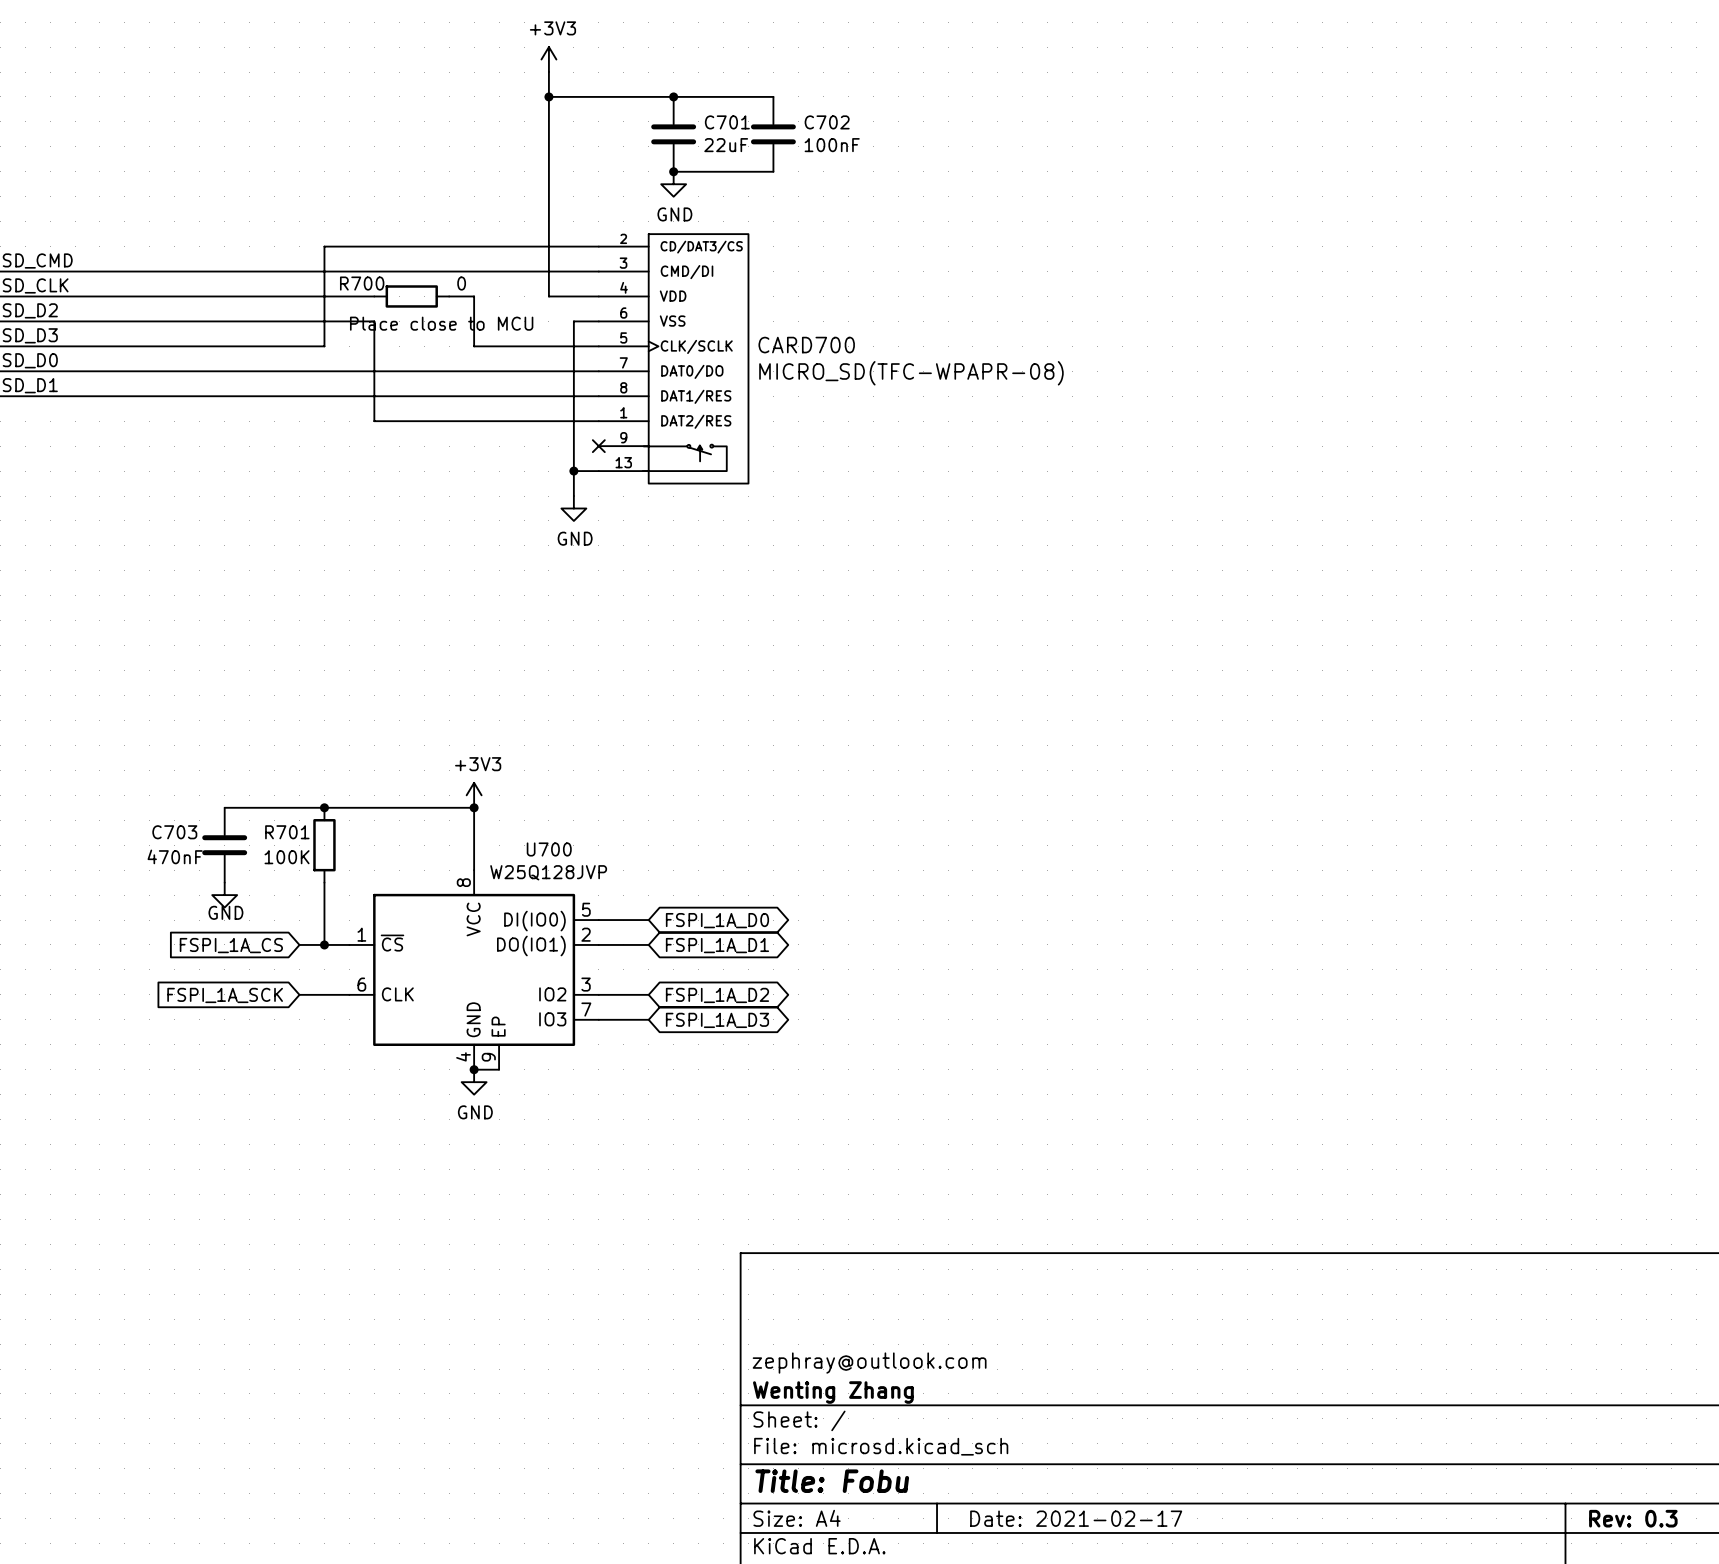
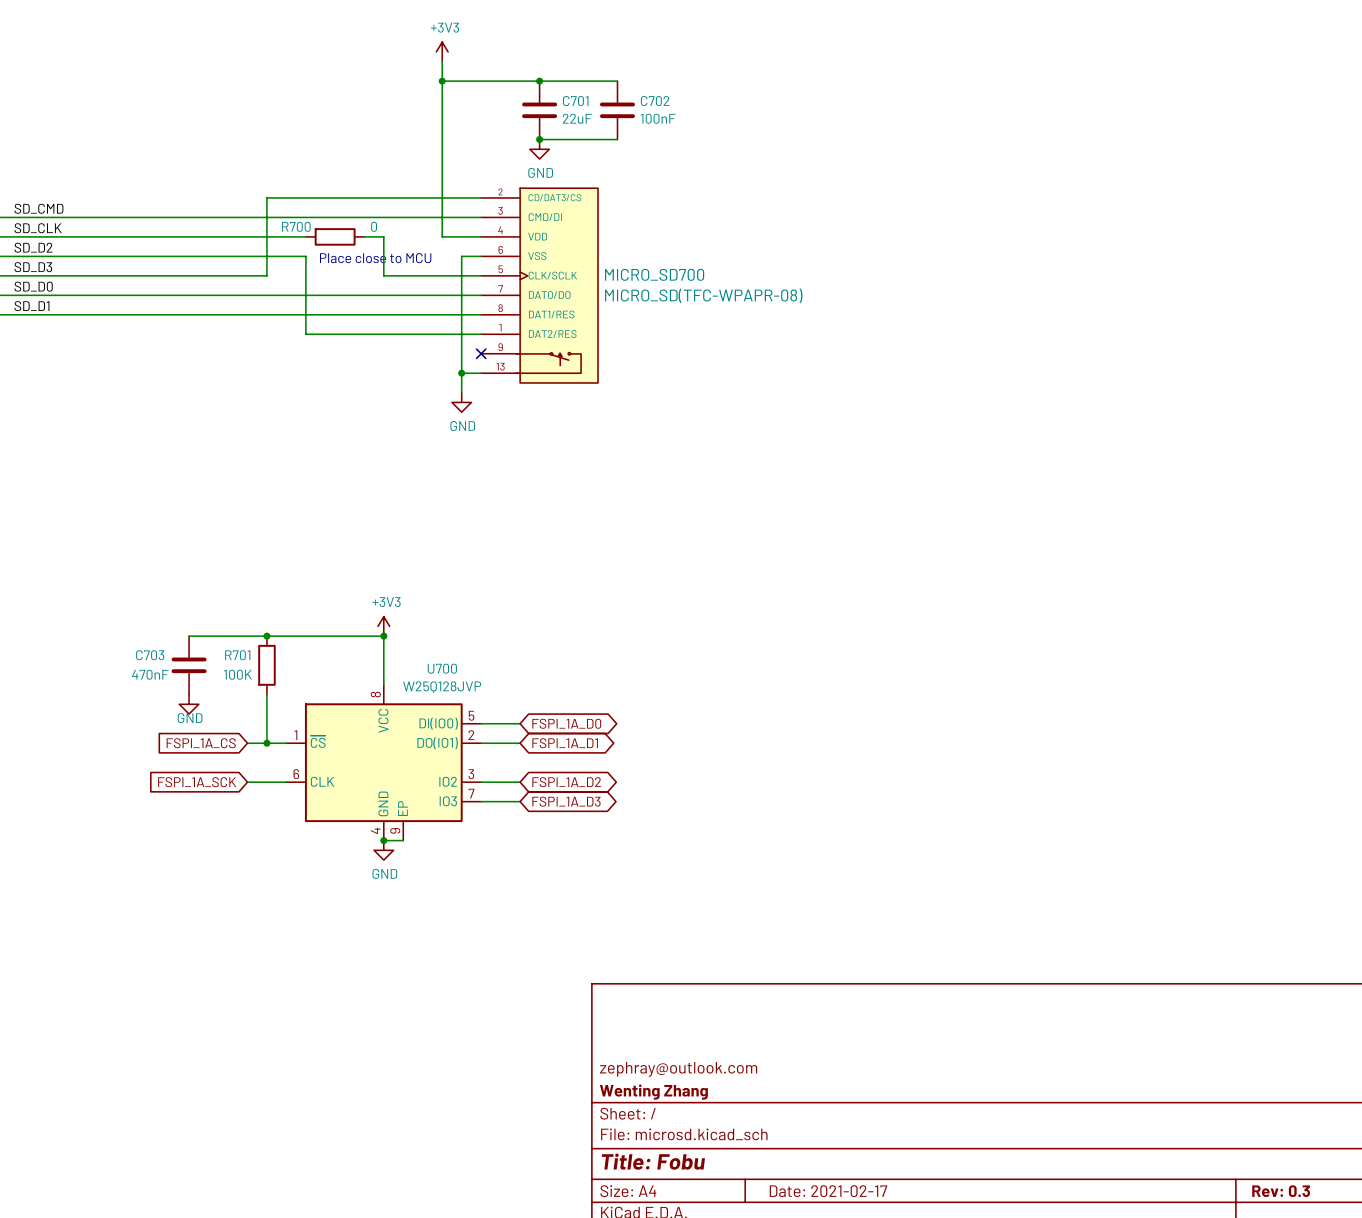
CARD700 name: CARD700 (806, 345) -> MICRO_SD700 (654, 274)

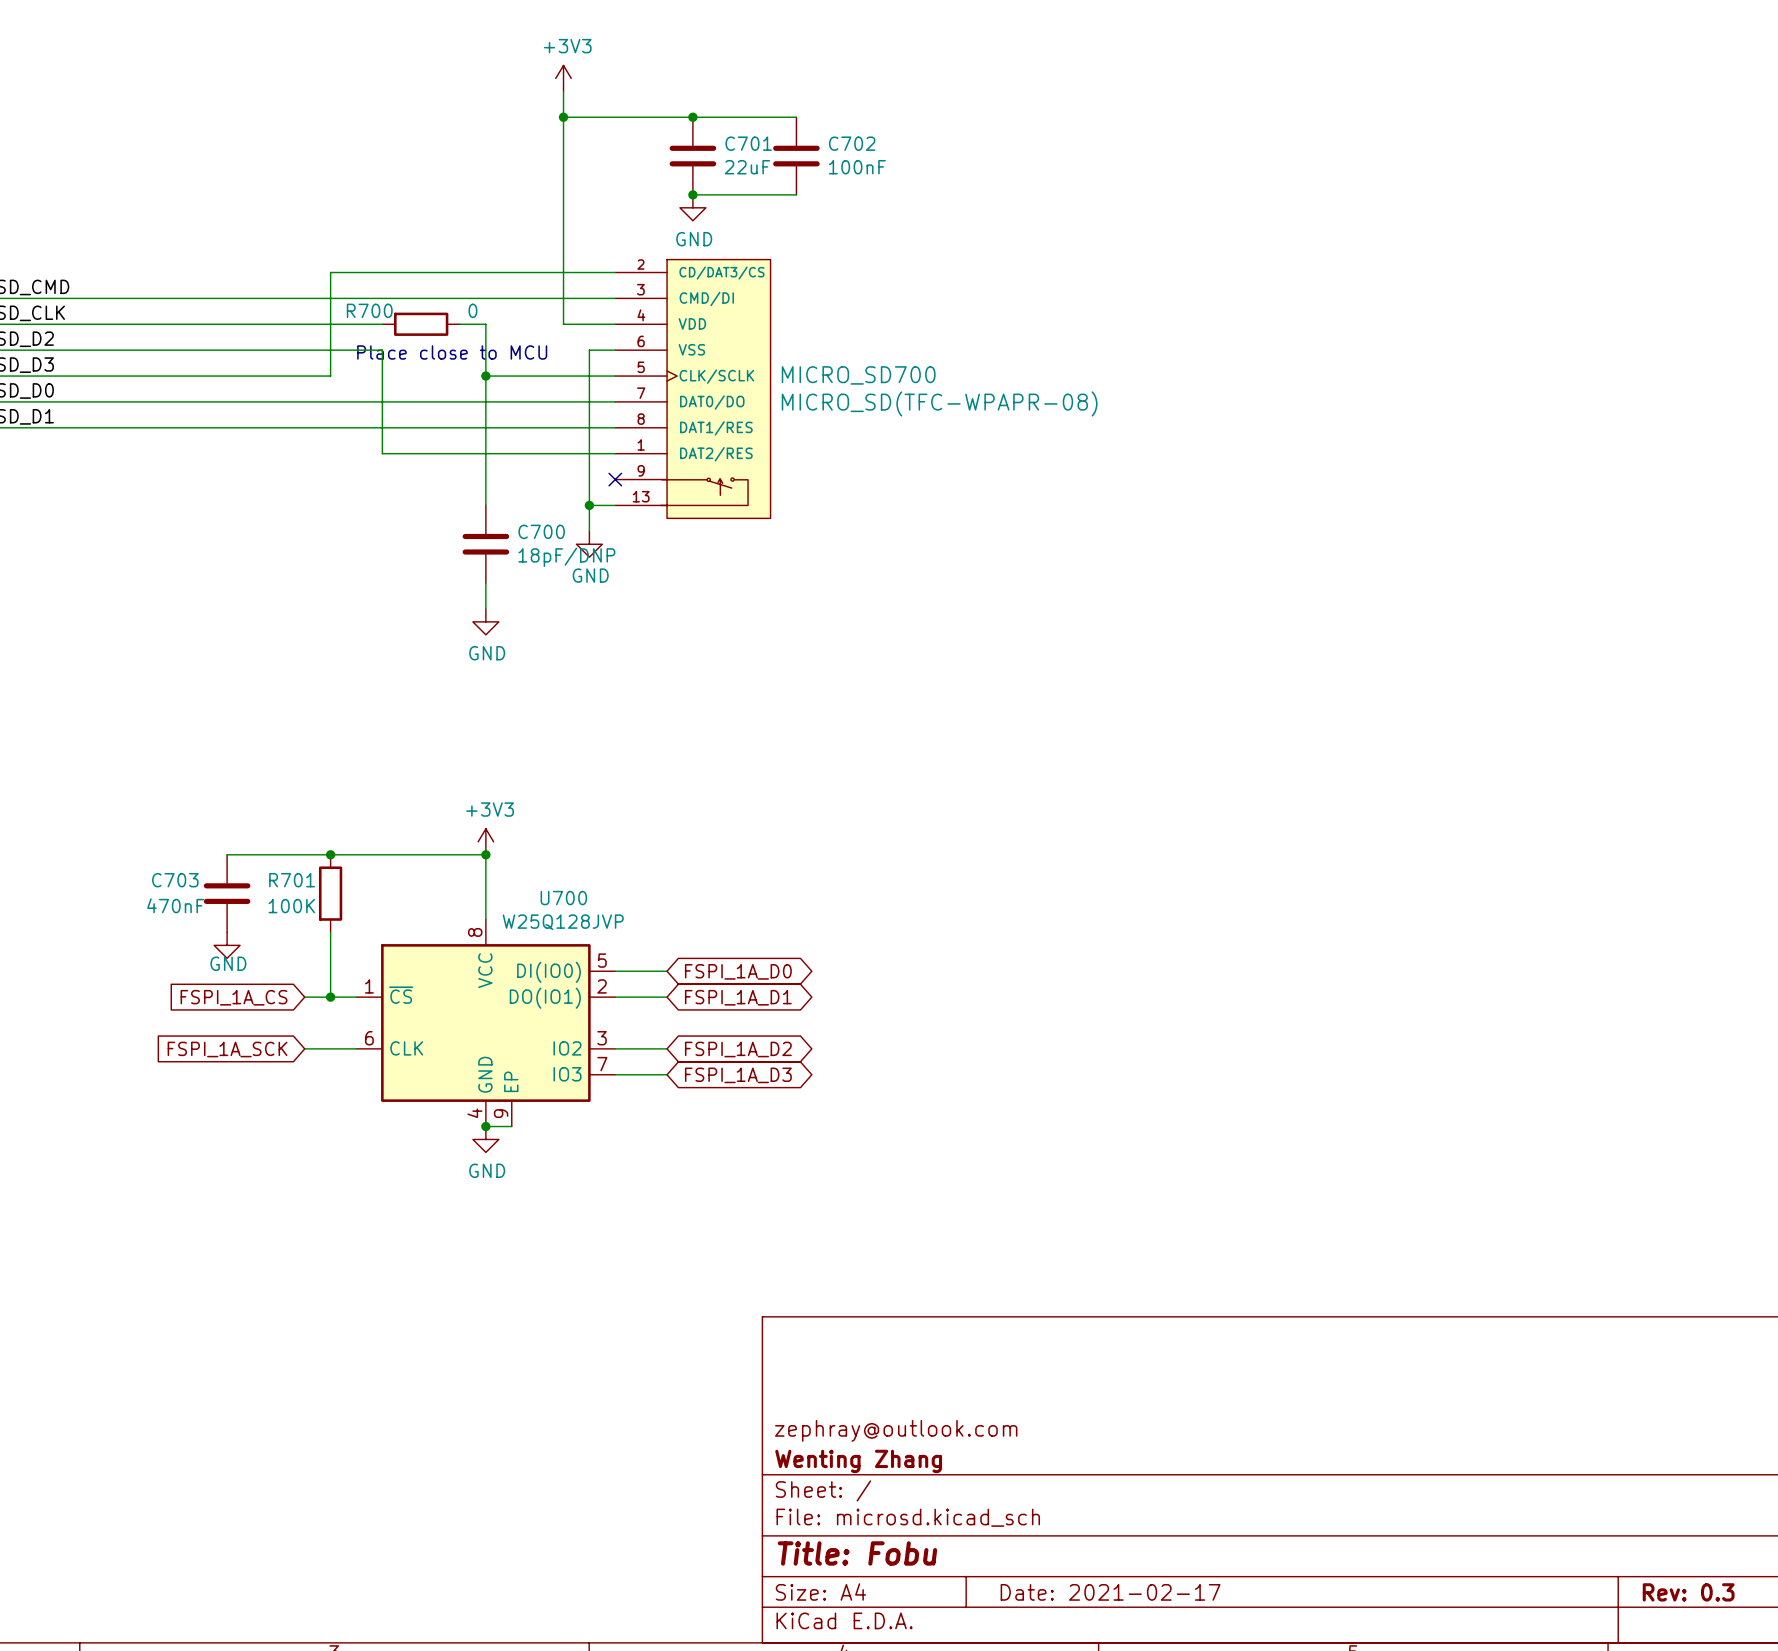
wire: none -> (485, 376) (485, 505)
junction: none -> (485, 376)
C700: none -> 18pF/DNP (485, 544)
wire: none -> (485, 583) (485, 608)
power symbol: none -> GND (485, 621)

